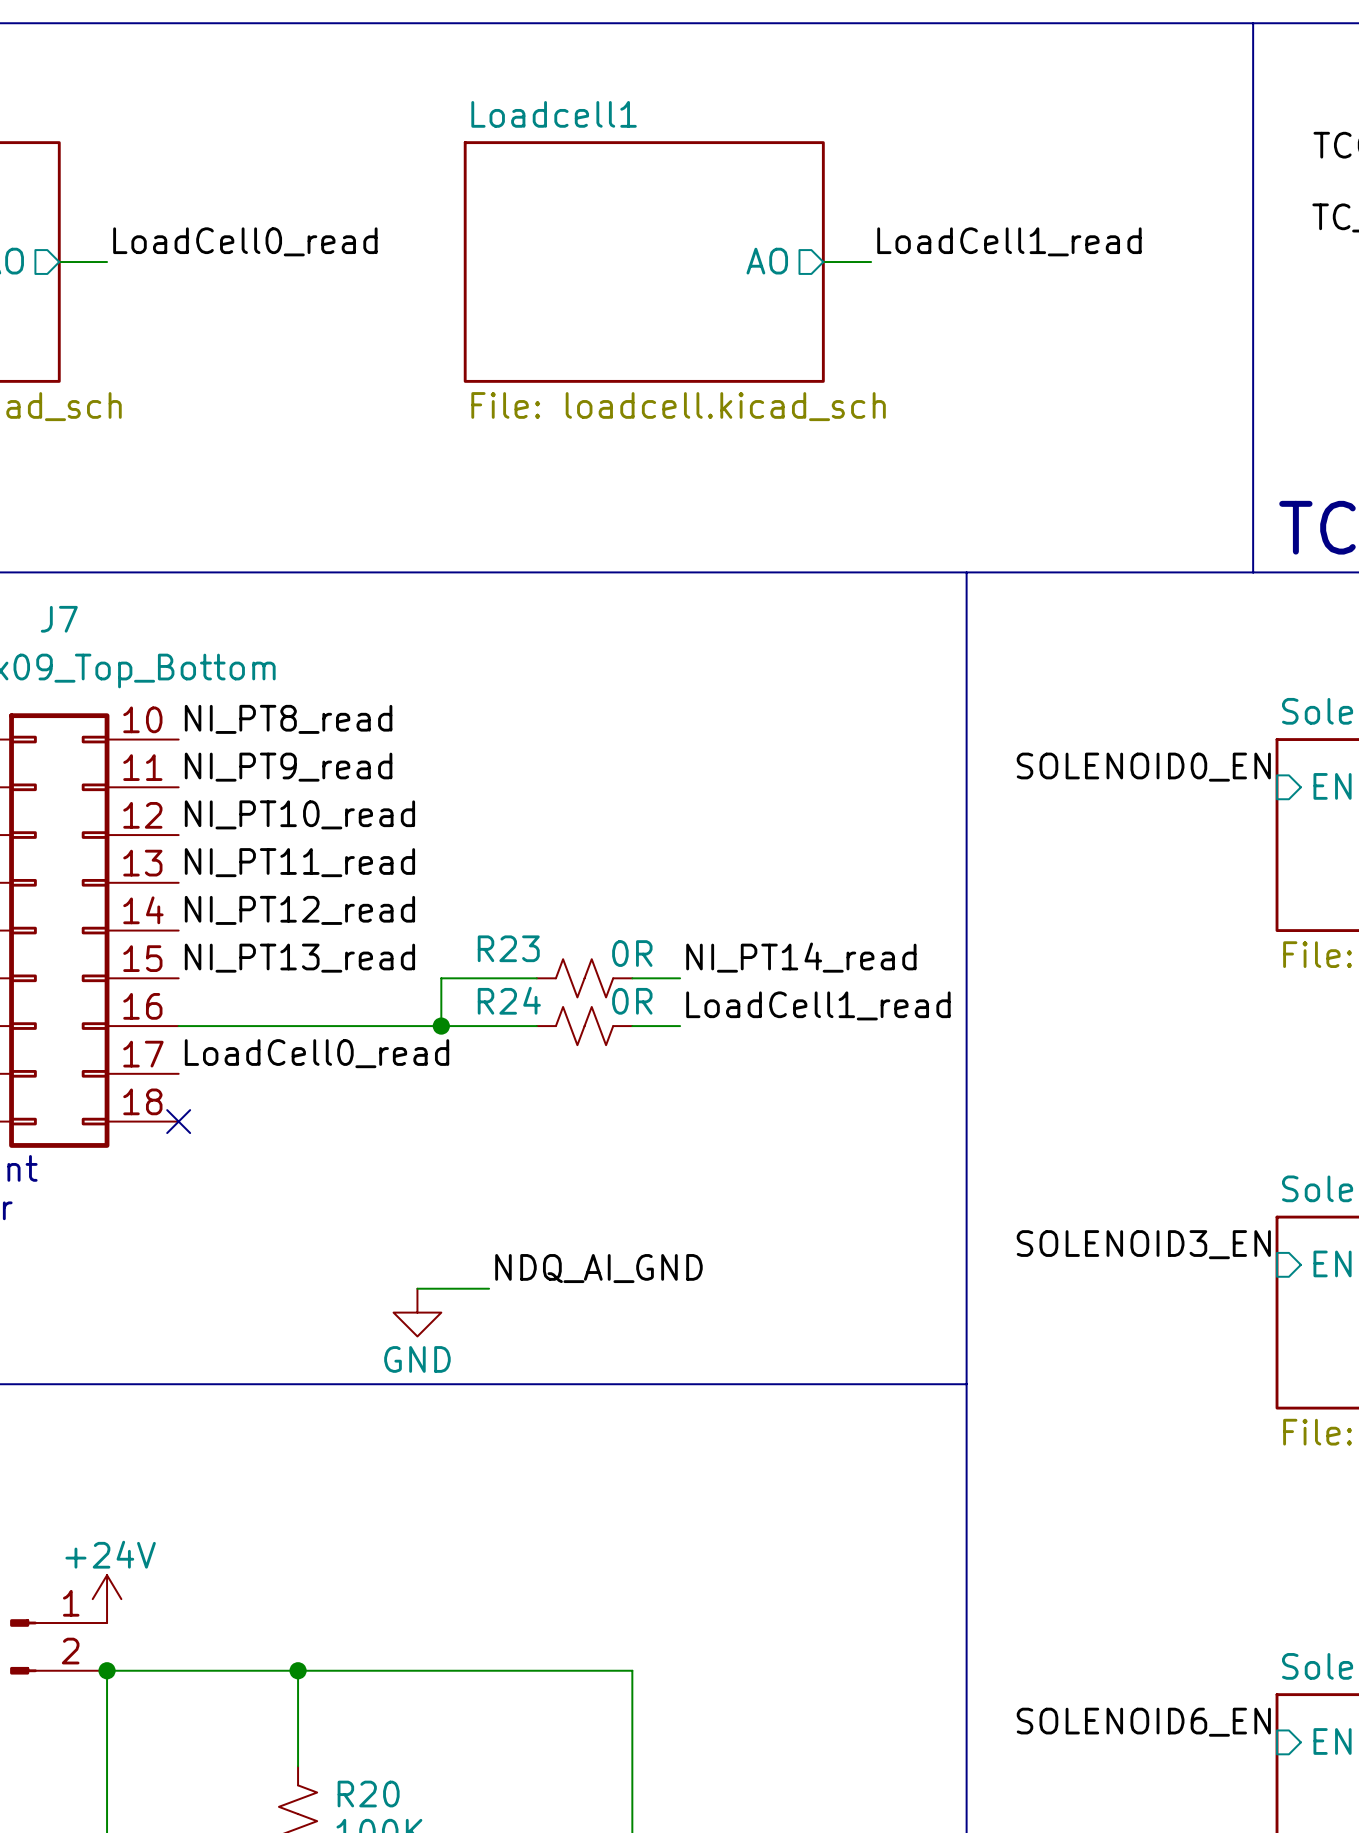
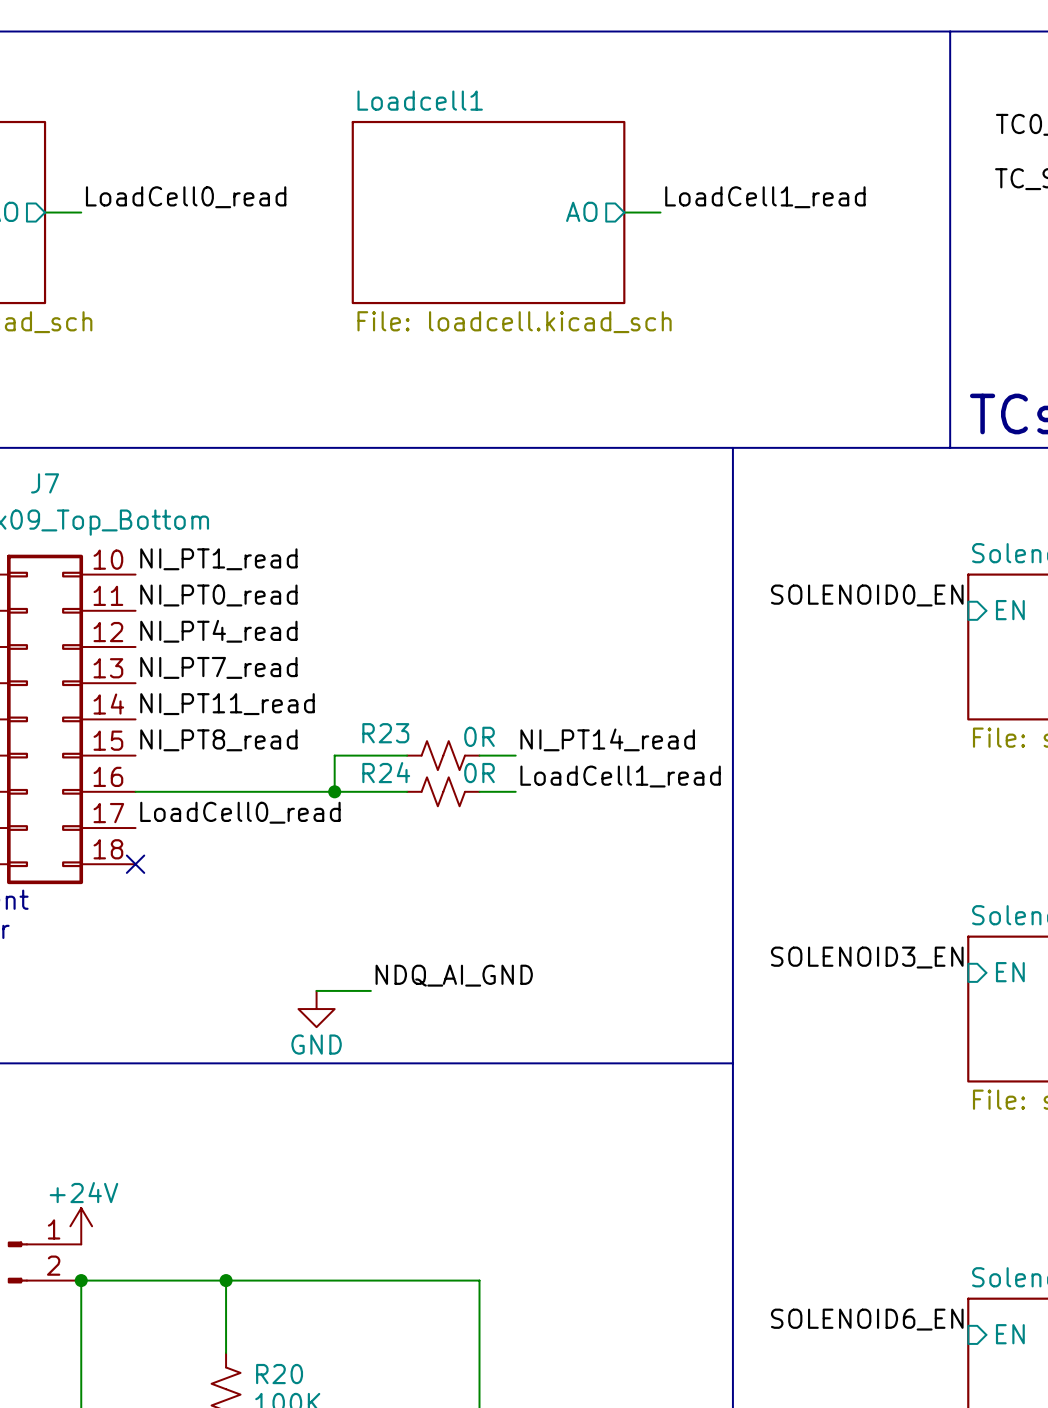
label: NI_PT8_read (288, 719) -> NI_PT1_read (218, 559)
label: NI_PT9_read (288, 767) -> NI_PT0_read (218, 595)
label: NI_PT10_read (299, 814) -> NI_PT4_read (218, 631)
label: NI_PT11_read (299, 862) -> NI_PT7_read (218, 667)
label: NI_PT12_read (299, 910) -> NI_PT11_read (227, 704)
label: NI_PT13_read (299, 958) -> NI_PT8_read (218, 740)

